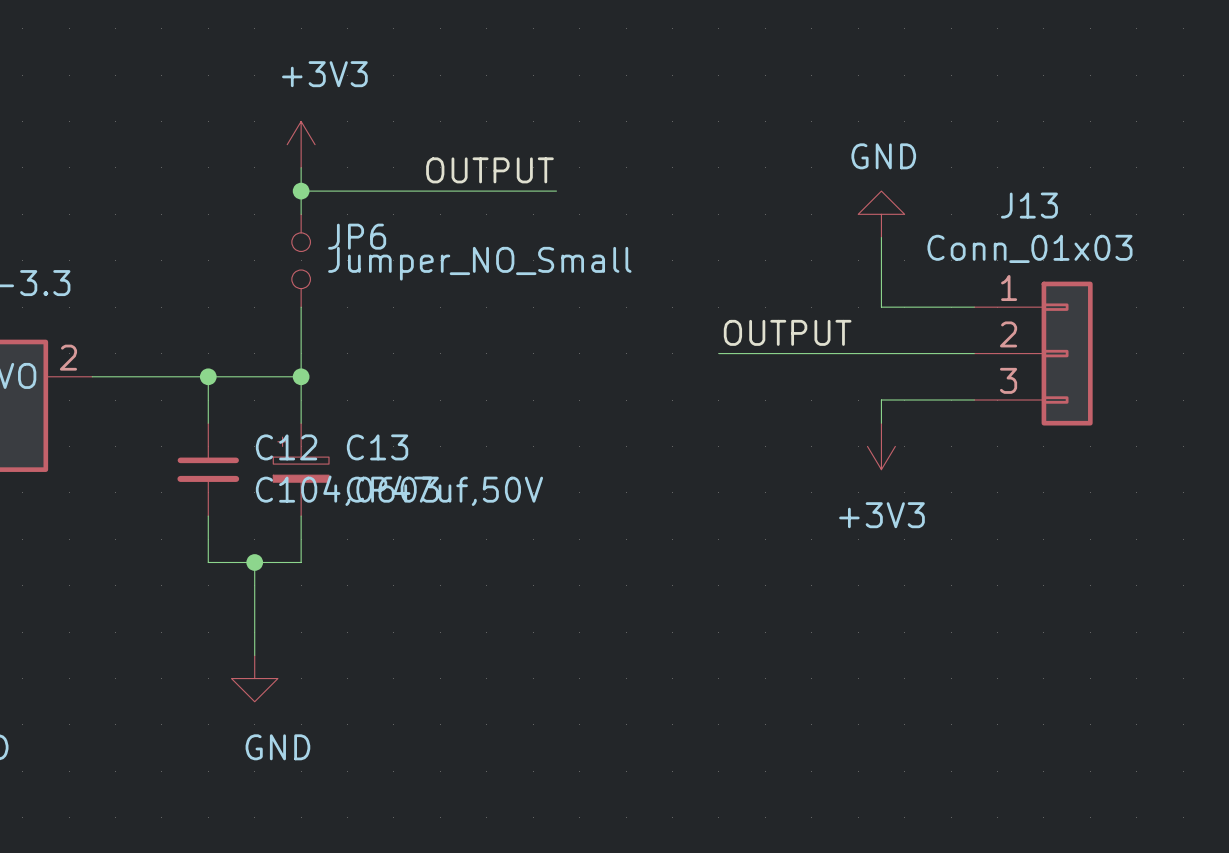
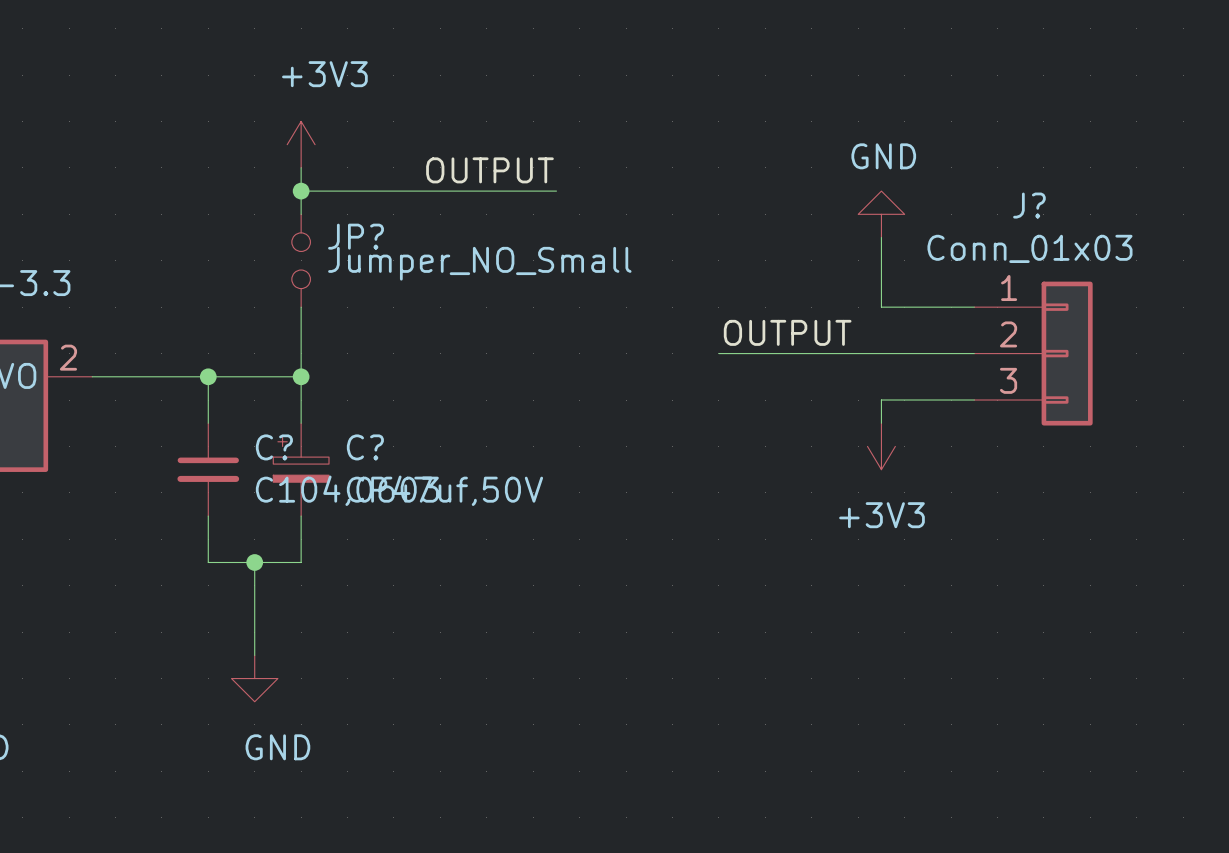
J13 name: J13 (1029, 205) -> J? (1029, 205)
JP6 name: JP6 (357, 236) -> JP? (356, 236)
C12 name: C12 (286, 447) -> C? (274, 447)
C13 name: C13 (377, 447) -> C? (365, 447)

